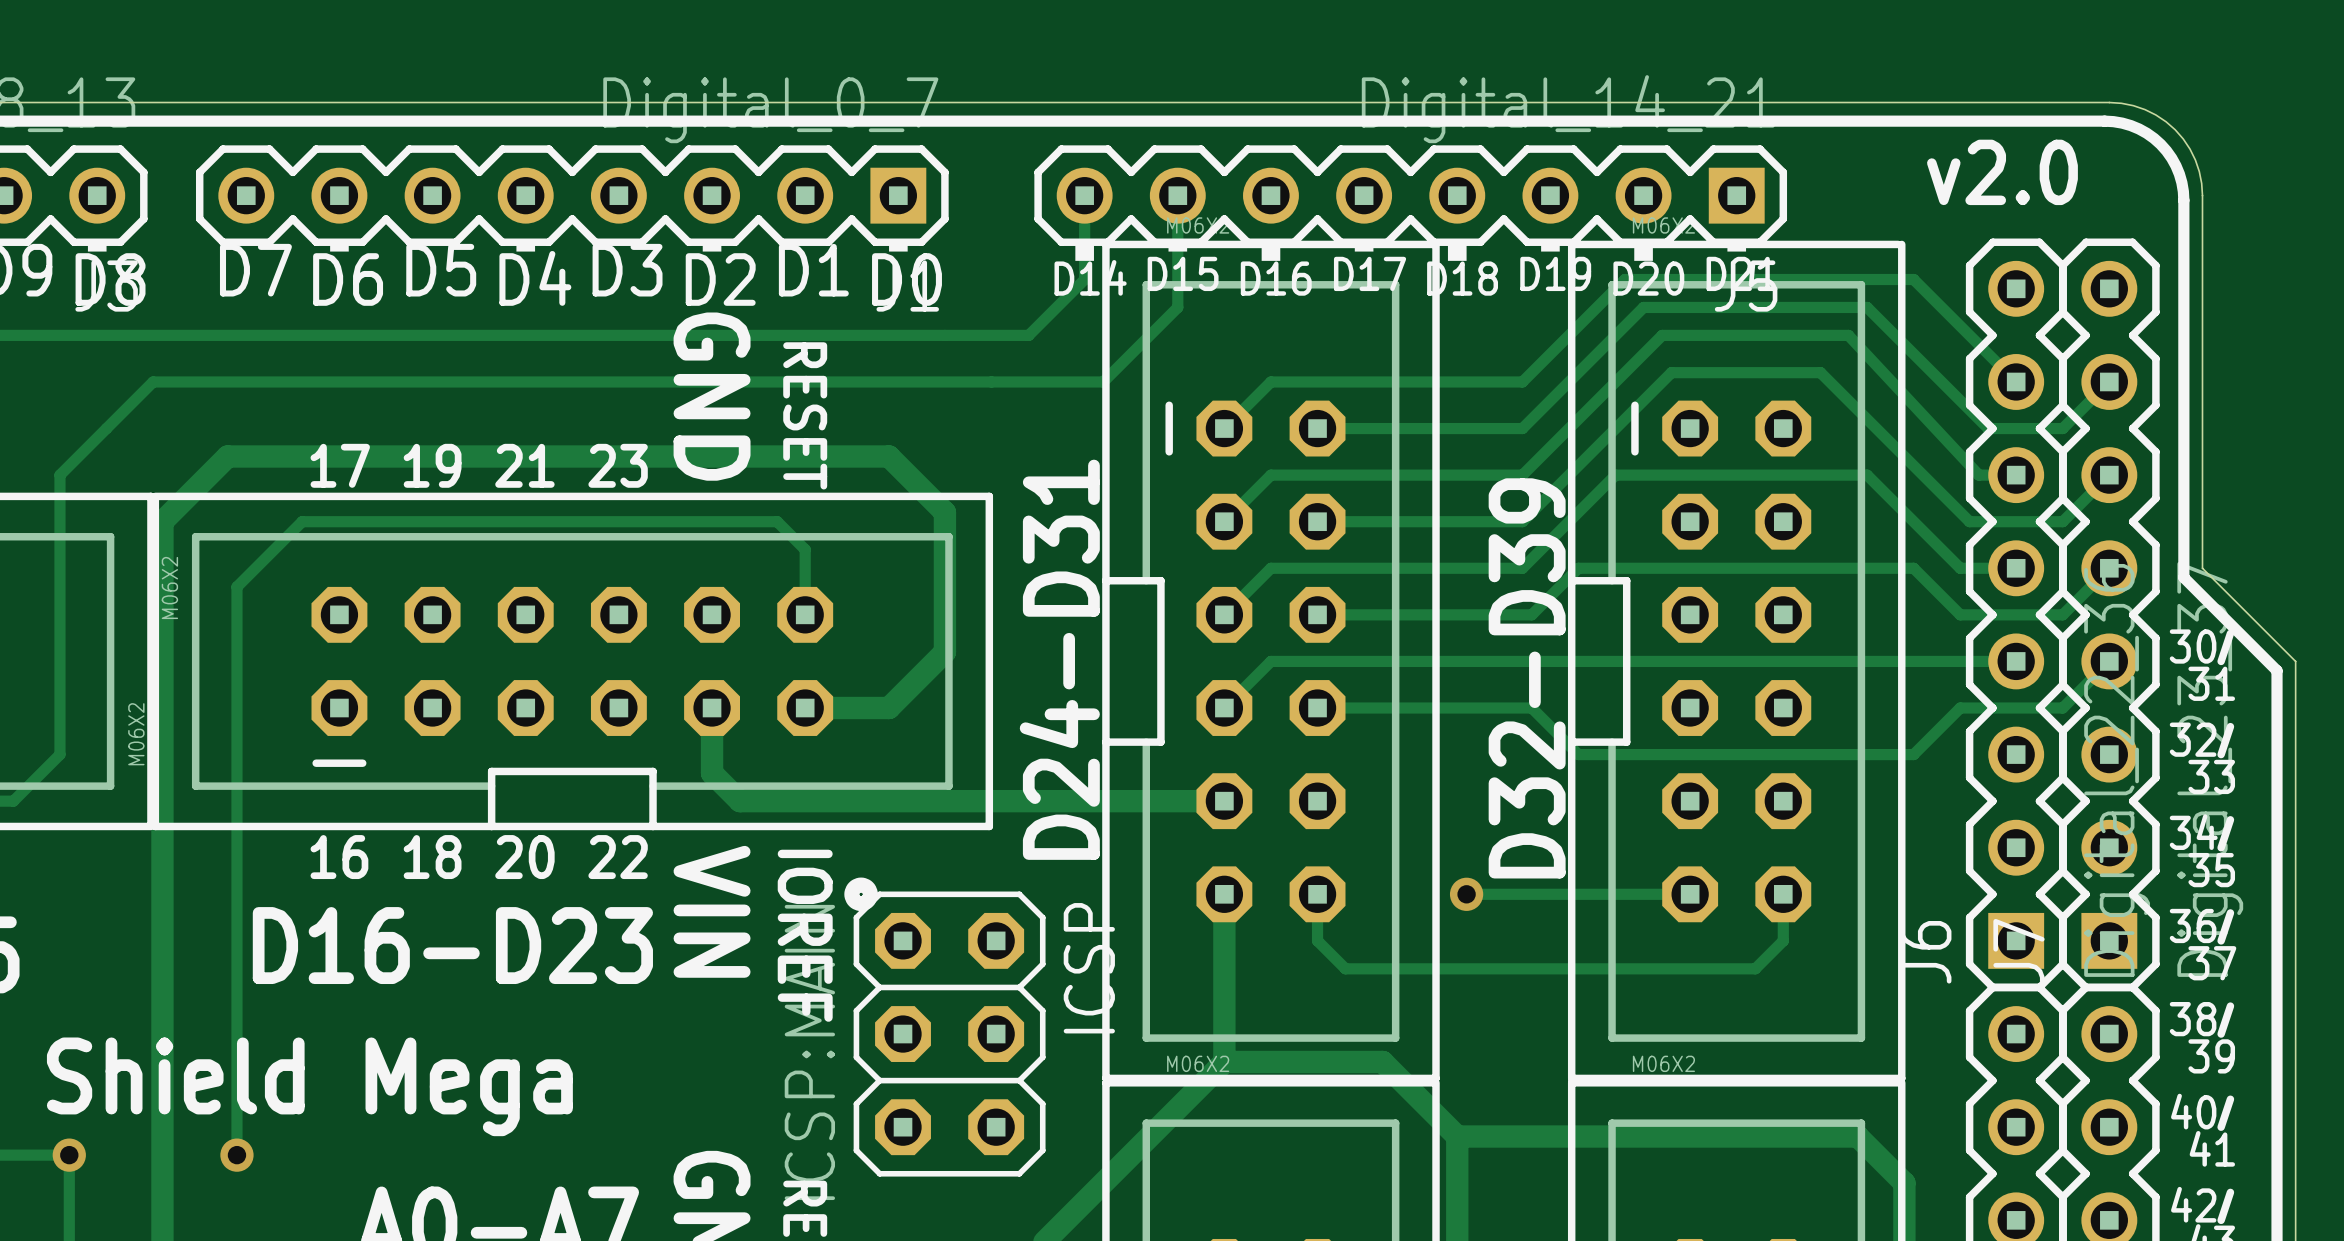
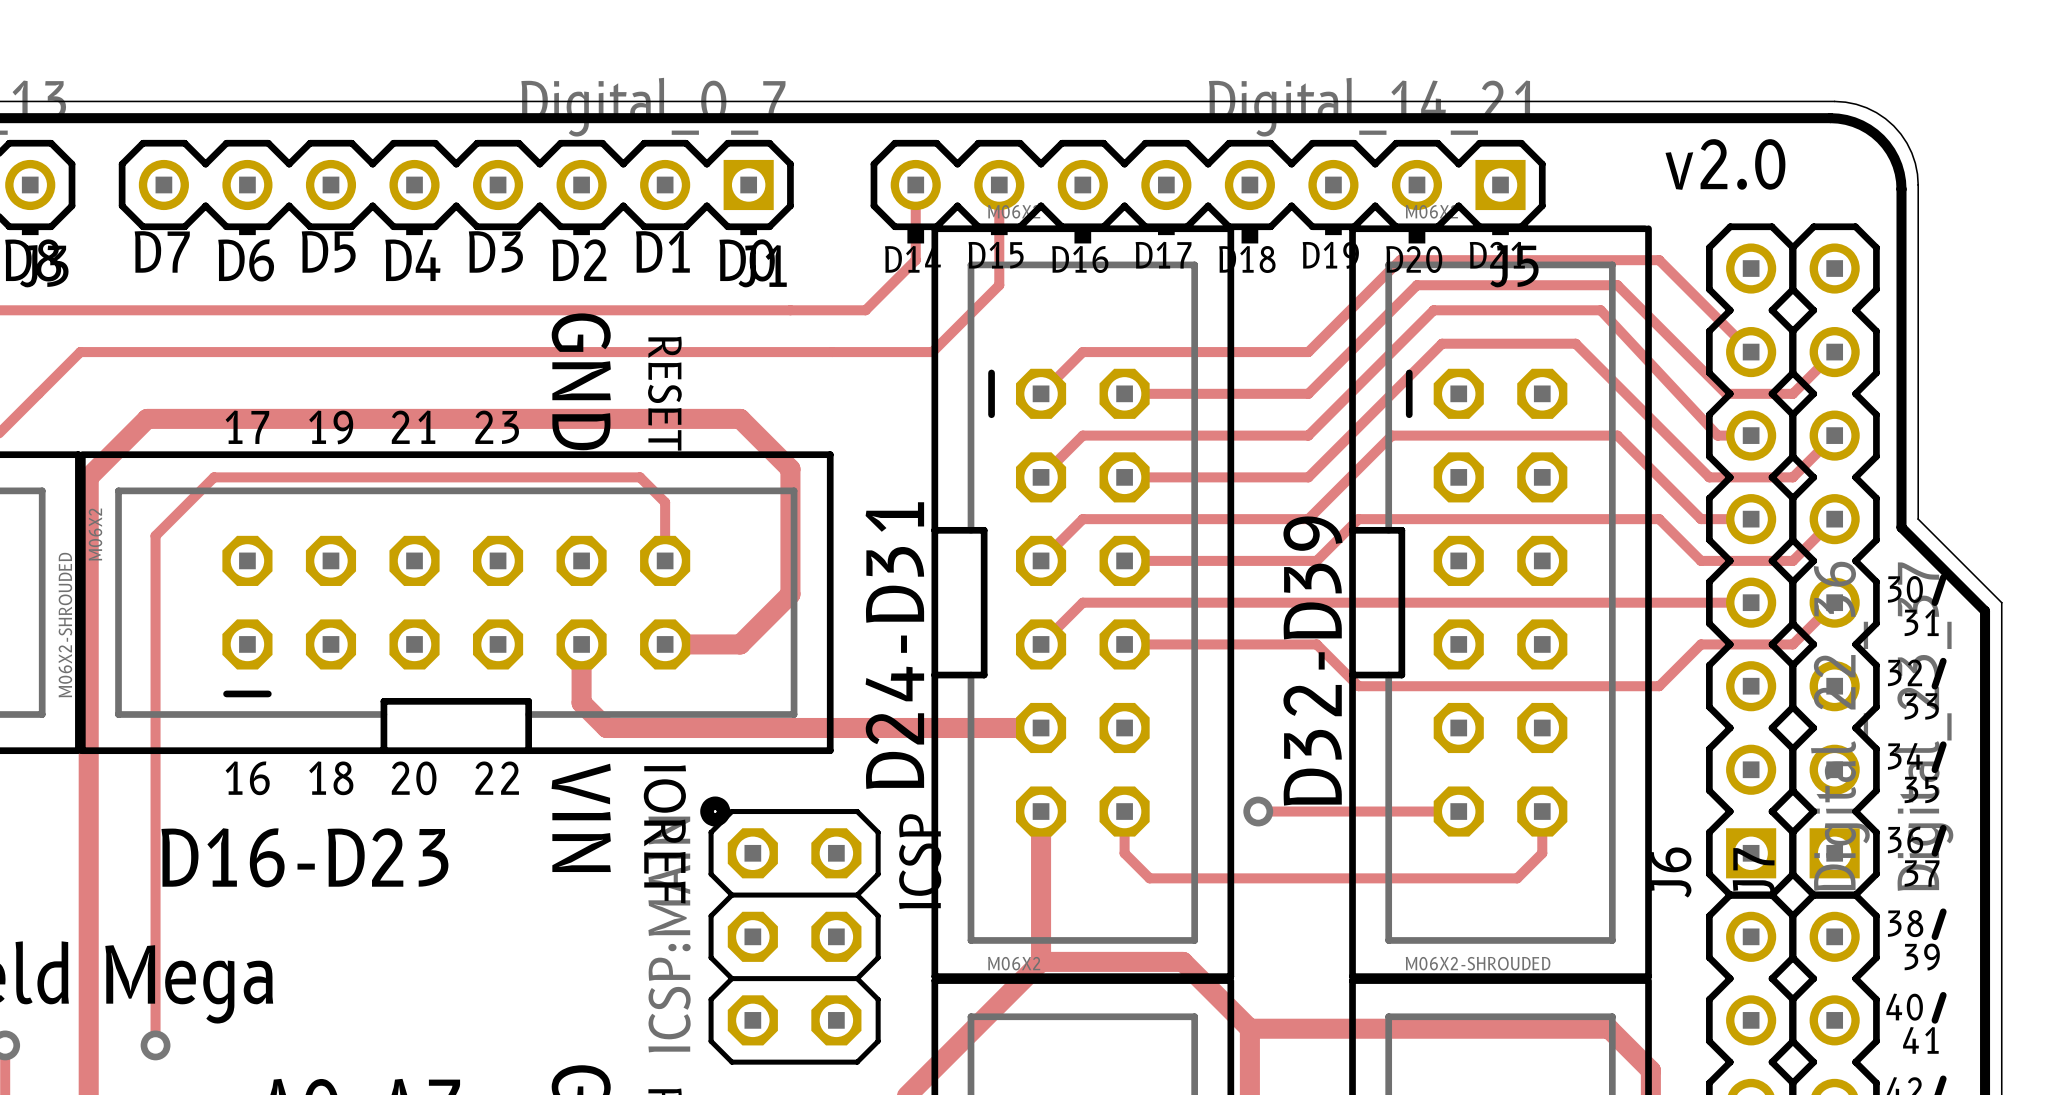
part value: M06X2 (136, 734) -> M06X2-SHROUDED (65, 625)
part value: M06X2 (1663, 1063) -> M06X2-SHROUDED (1478, 963)

